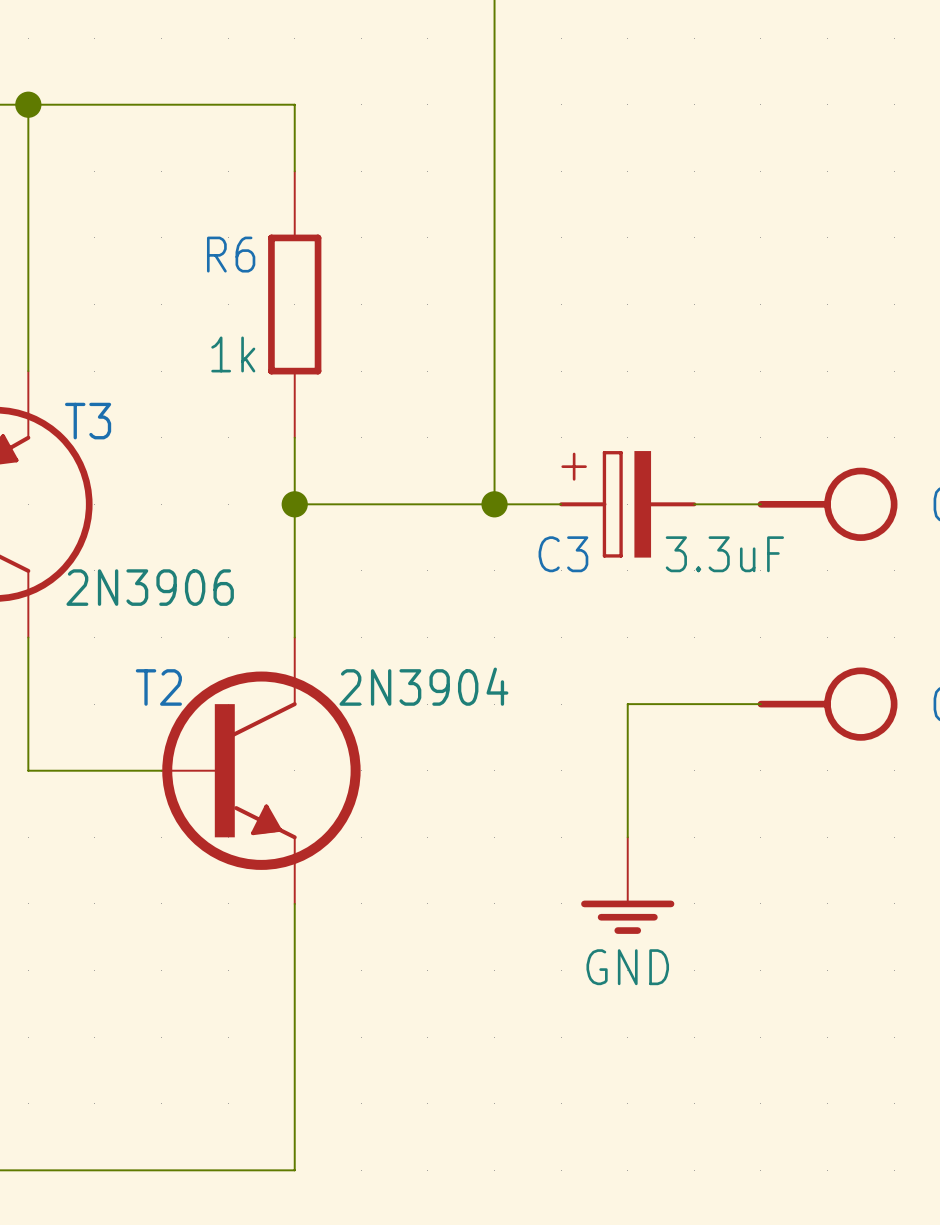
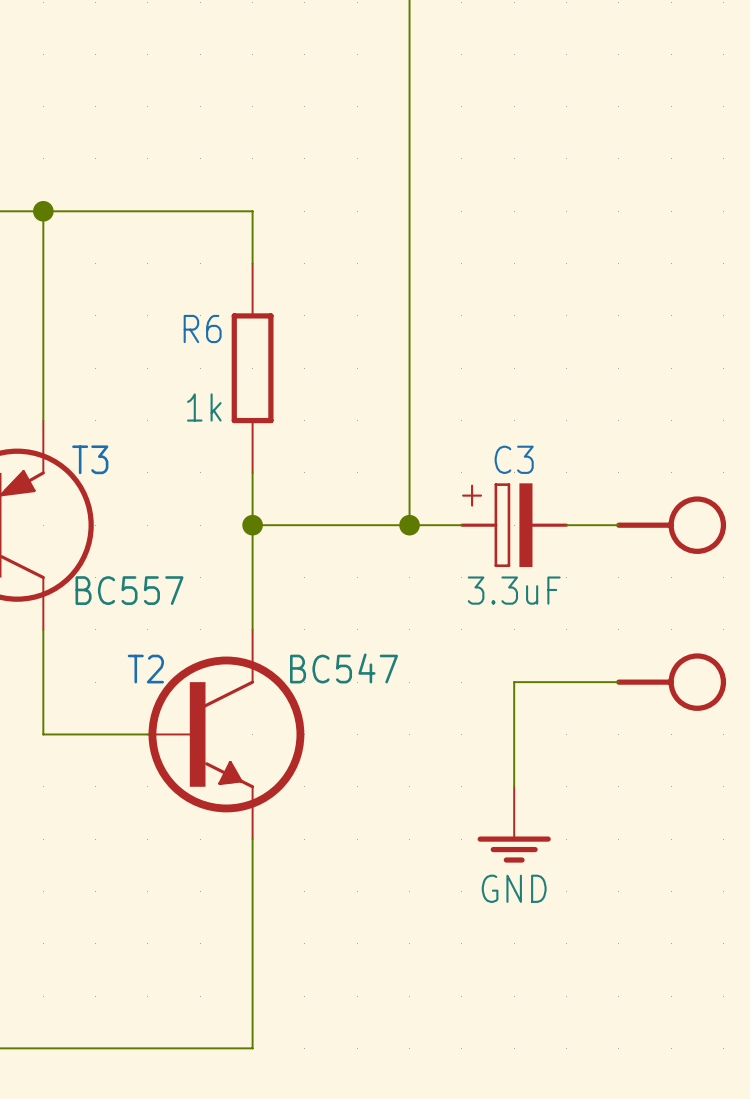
C3 name position: C3 (563, 554) -> C3 (514, 459)
C3 value position: 3.3uF (724, 554) -> 3.3uF (514, 590)
T3 value: 2N3906 (150, 587) -> BC557 (129, 590)
T2 value: 2N3904 (423, 686) -> BC547 (344, 668)

